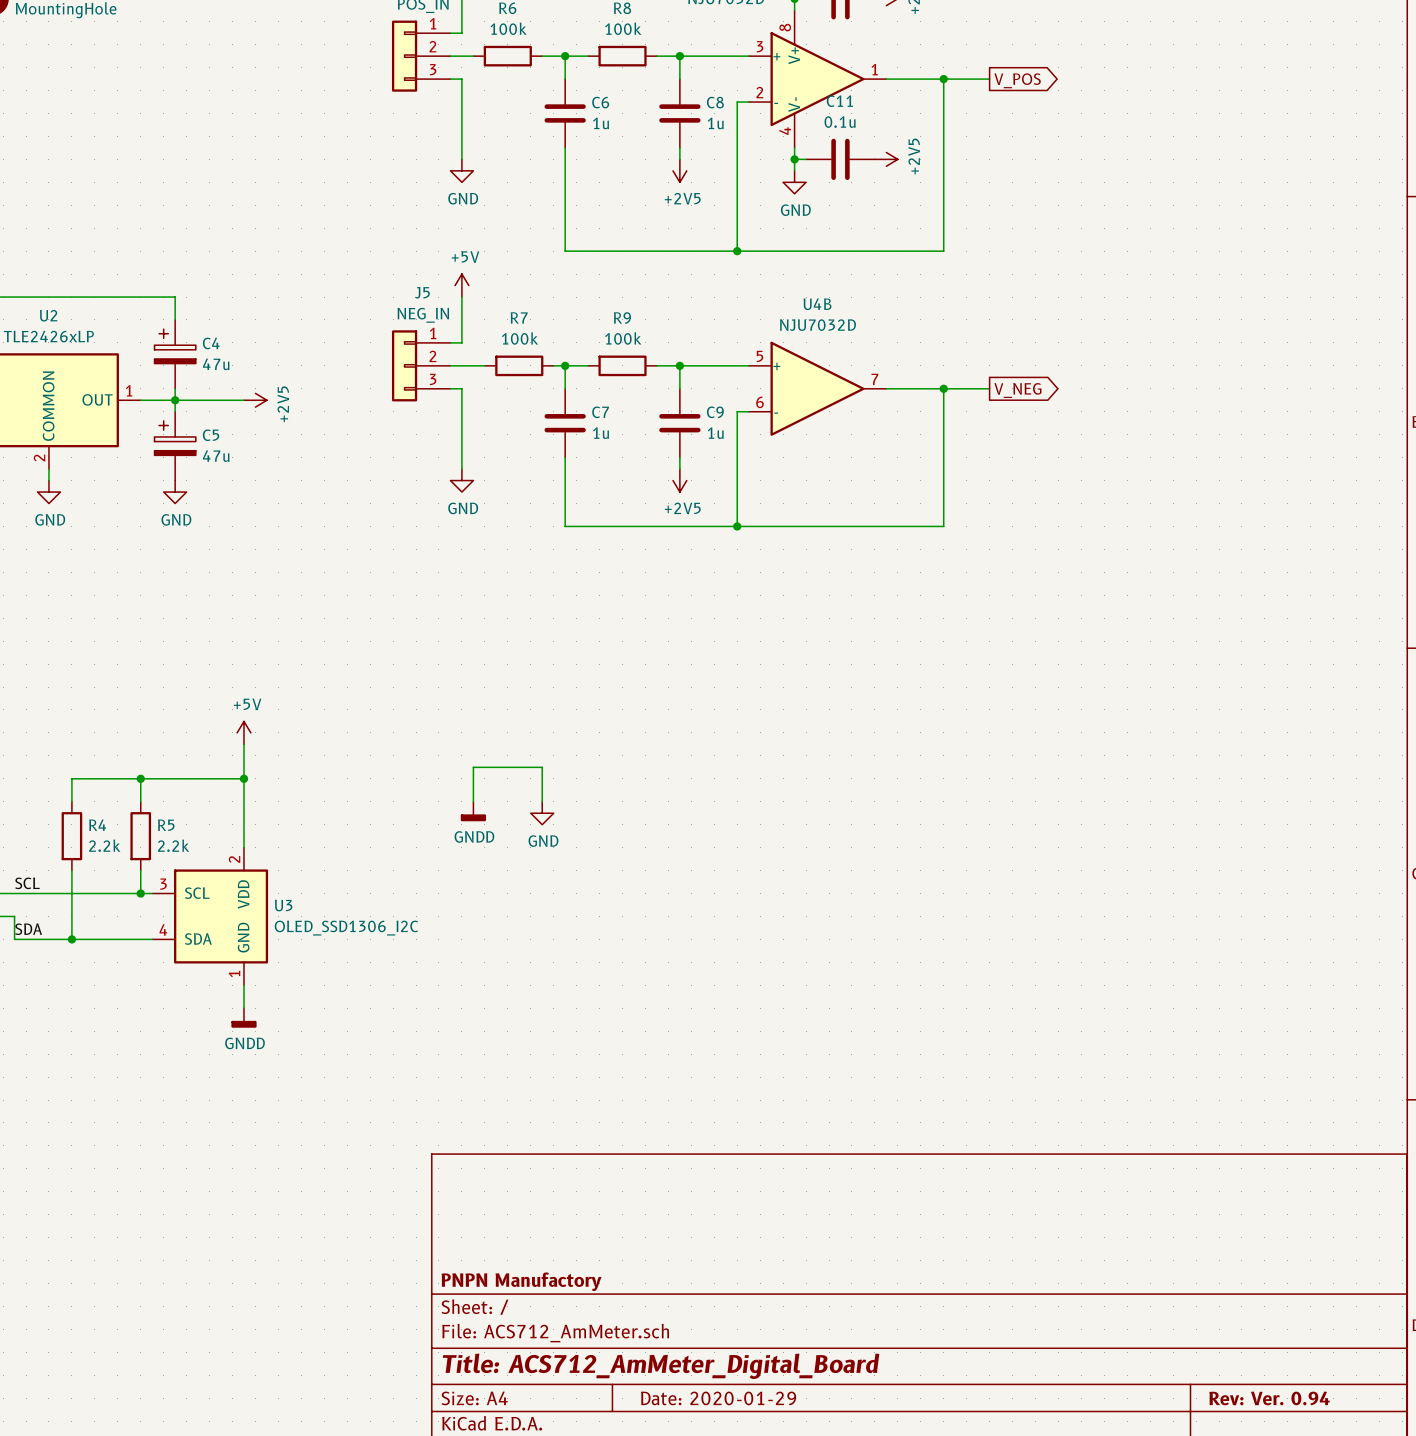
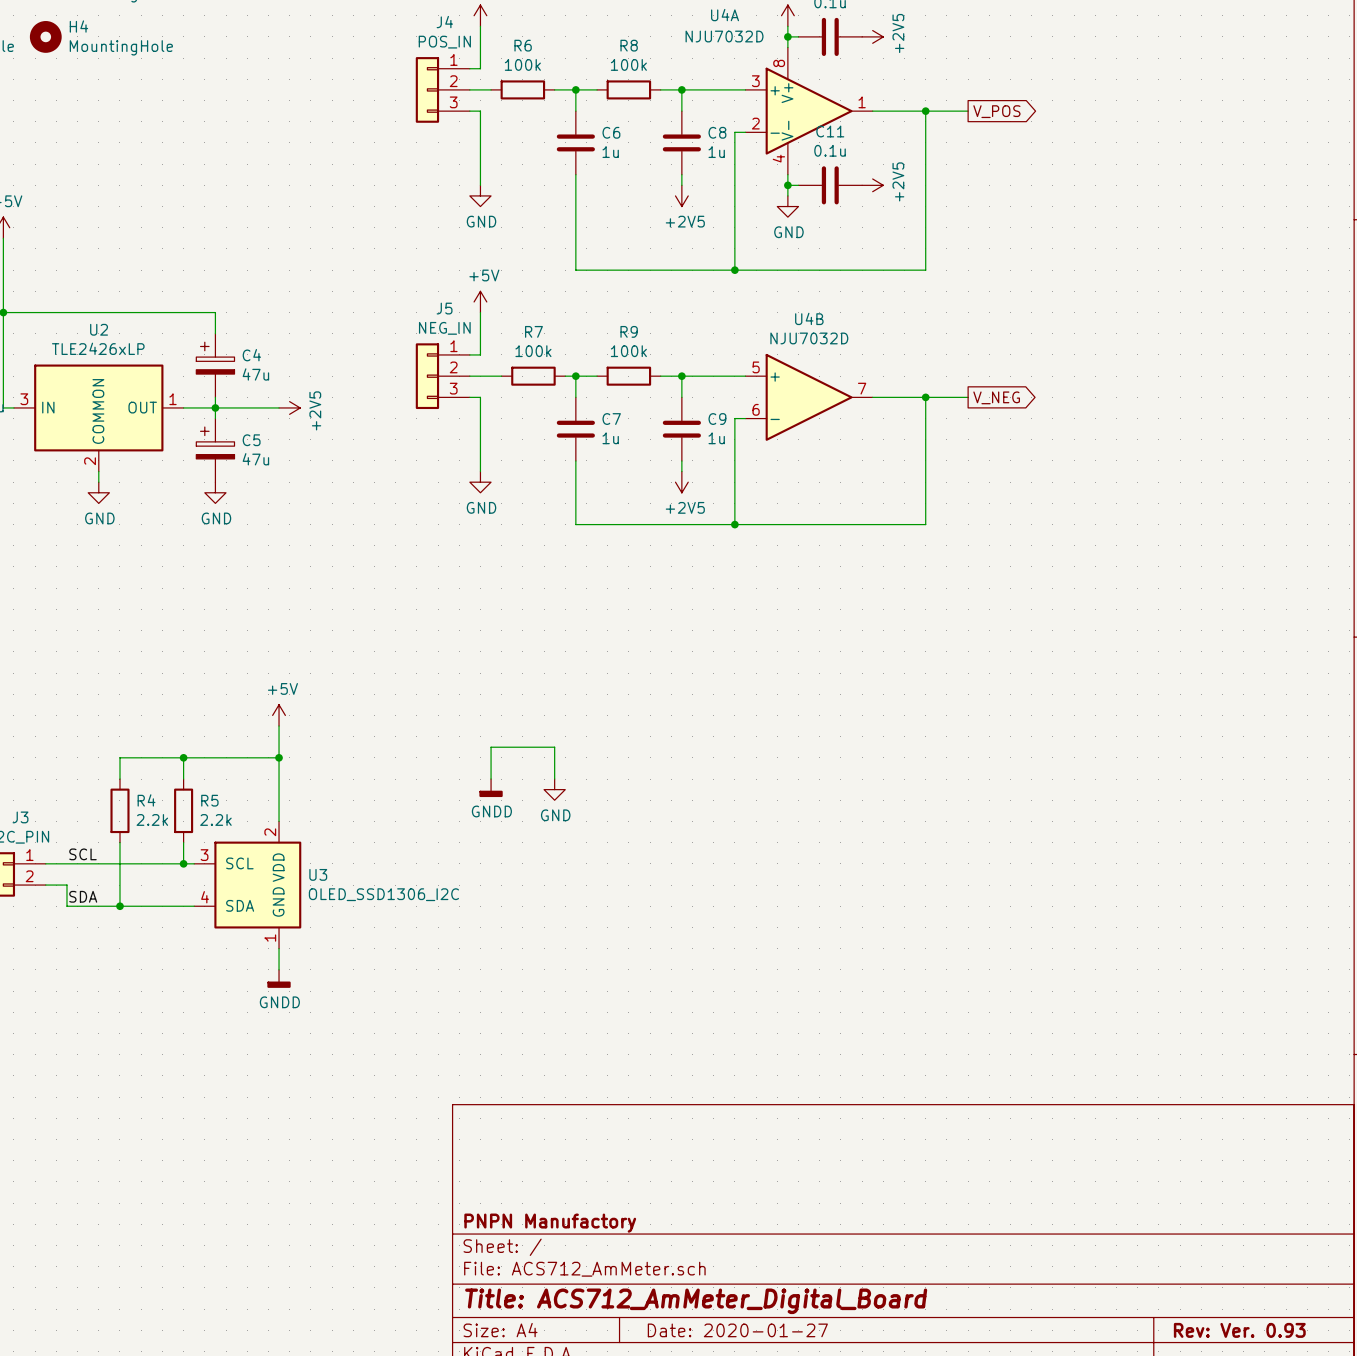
title block: Date: 2020-01-29 (718, 1398) -> Date: 2020-01-27 (737, 1330)
title block: Rev: Ver. 0.94 (1269, 1398) -> Rev: Ver. 0.93 (1239, 1330)

